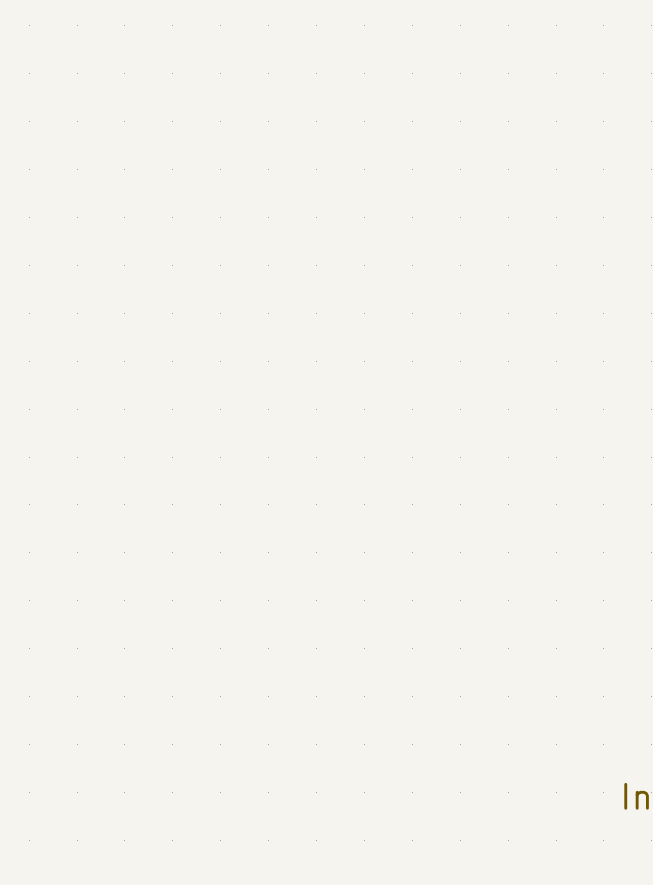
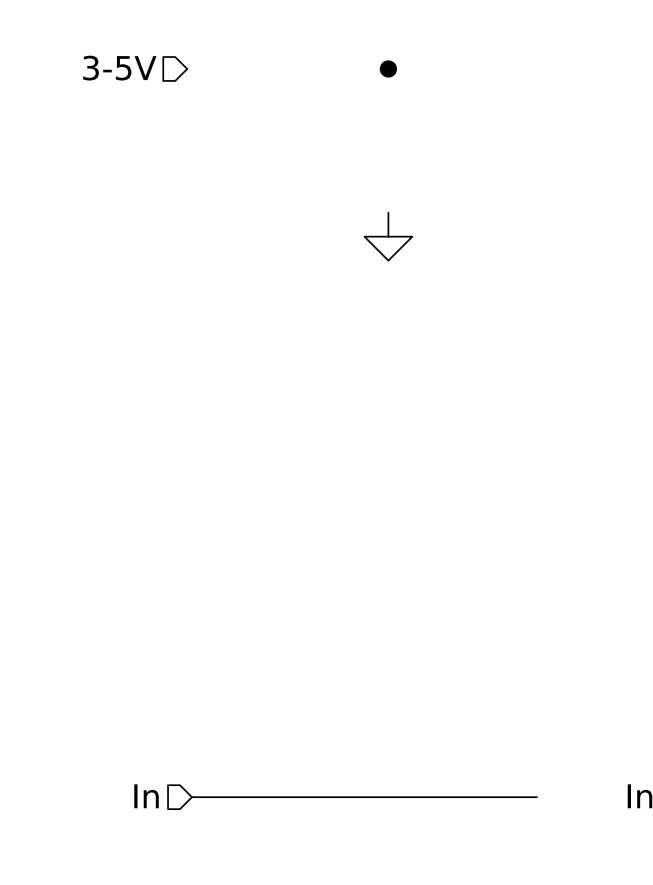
hierarchical label: none -> 3-5V (119, 68)
junction: none -> (388, 68)
power symbol: none -> (388, 236)
hierarchical label: none -> In (146, 796)
wire: none -> (191, 797) (536, 797)

